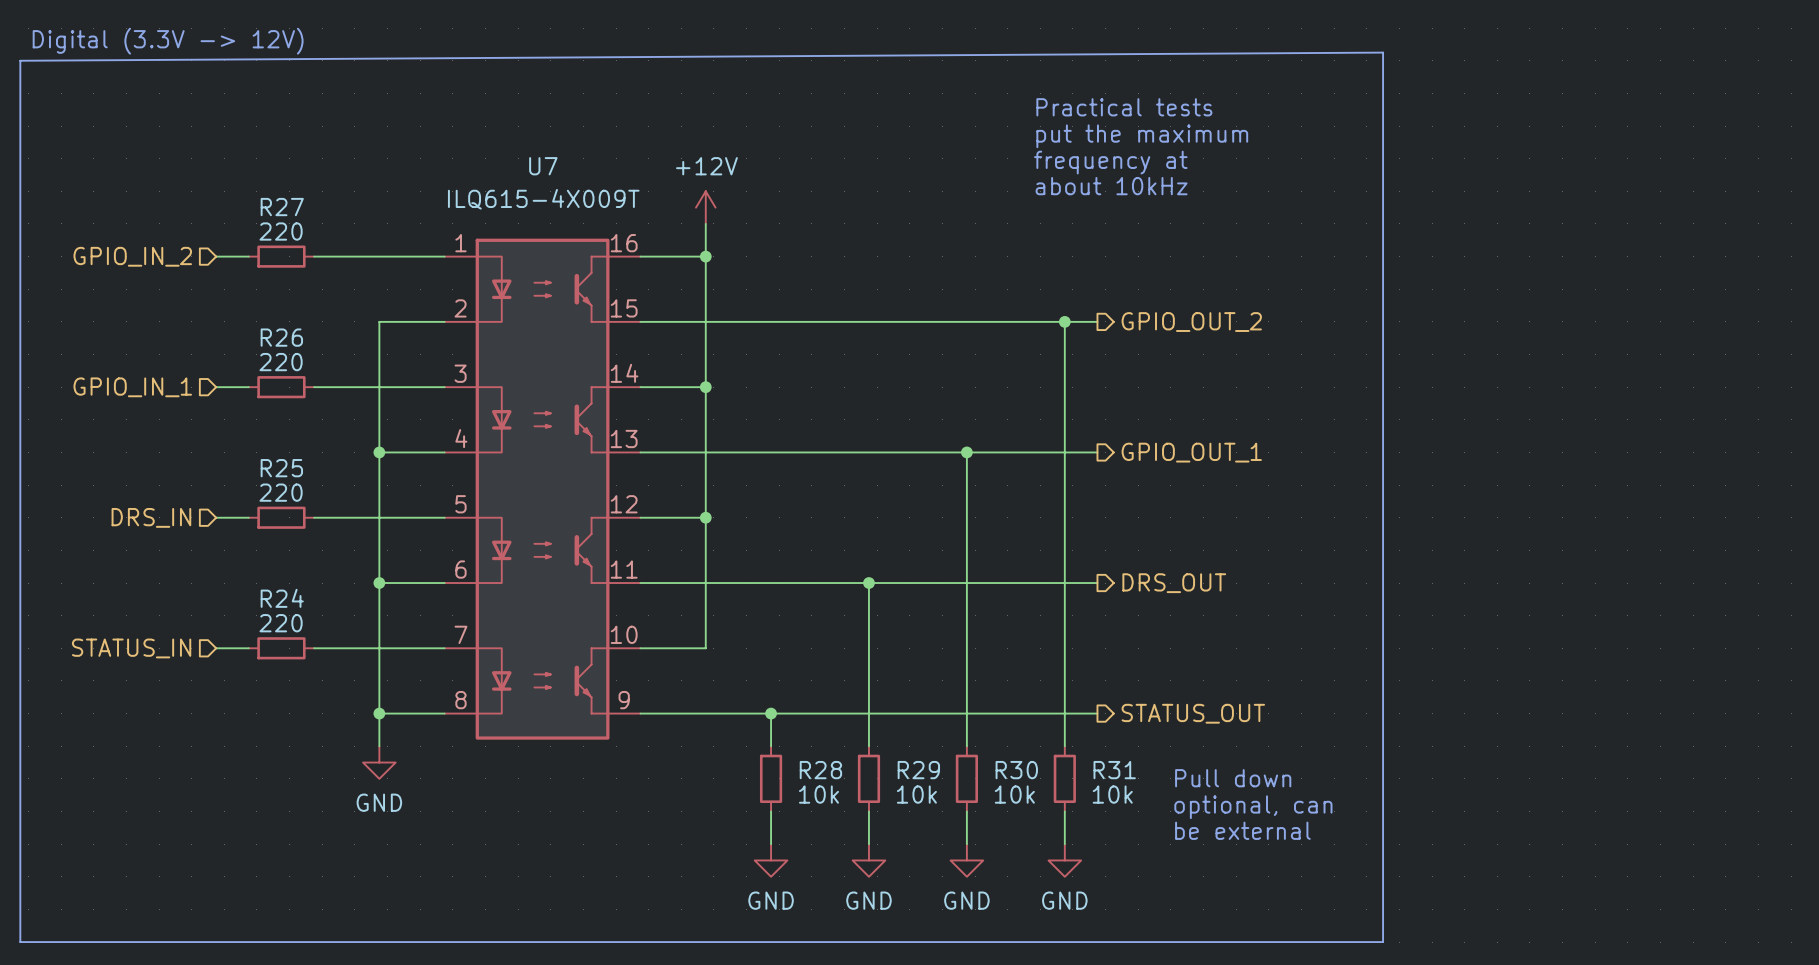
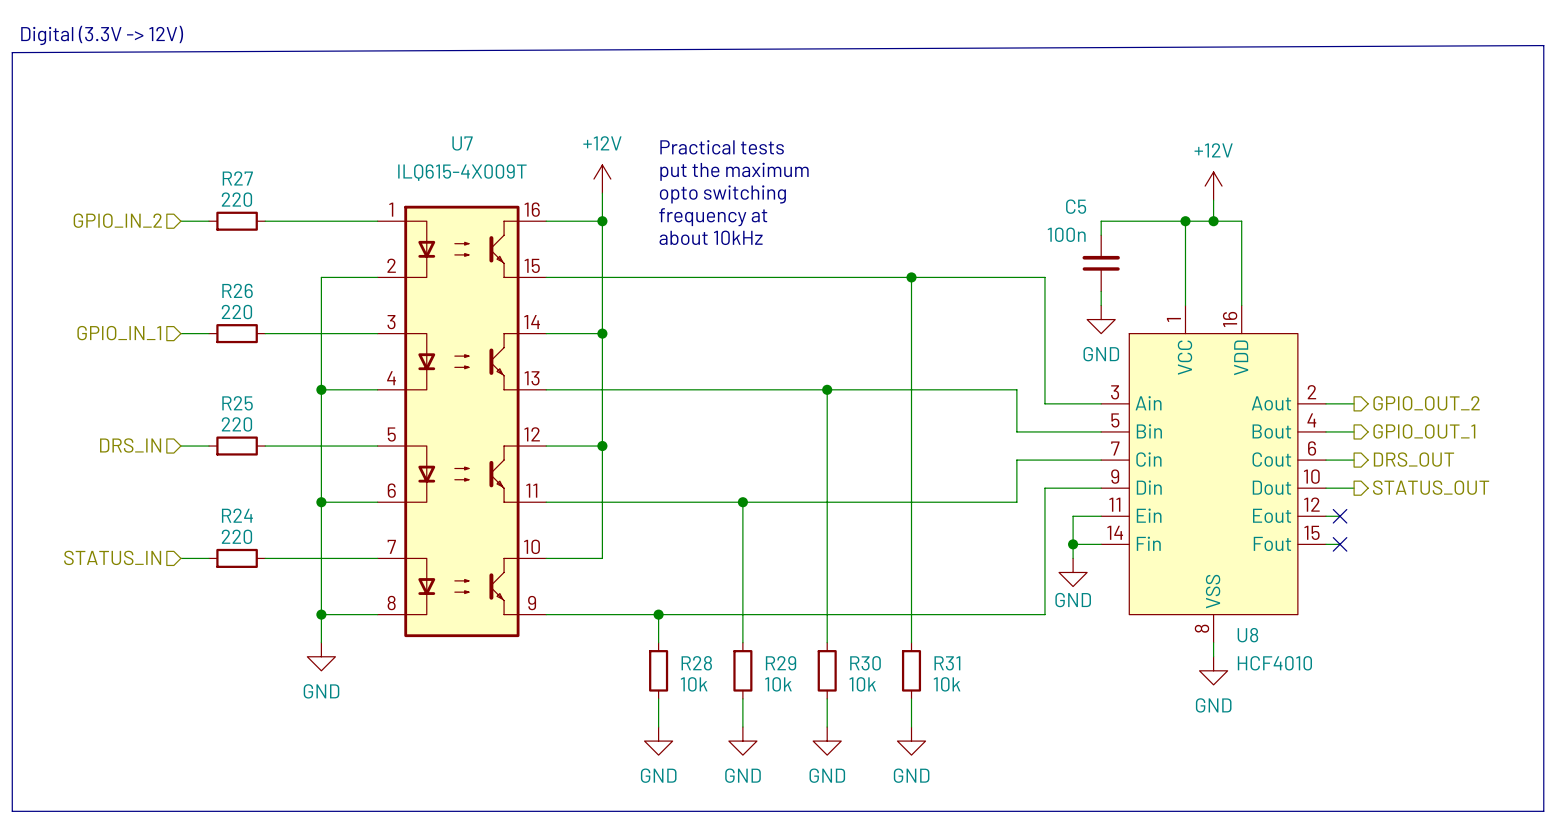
line: (20, 60) (1383, 52) (1383, 942) -> (12, 52) (1543, 45) (1543, 811) (1185, 811)
text position: Practical tests (1124, 107) -> Practical tests (722, 147)
text position: put the maximum (1142, 136) -> put the maximum (734, 171)
text position: frequency at (1110, 162) -> frequency at (713, 217)
text position: about 10kHz (1111, 186) -> about 10kHz (711, 237)
power symbol: none -> +12V (1213, 186)
text: none -> opto switching (722, 194)
wire: none -> (1213, 200) (1213, 221)
junction: none -> (1185, 221)
junction: none -> (1213, 221)
wire: none -> (1101, 235) (1101, 221) (1241, 221) (1241, 305)
C5: none -> 100n (1101, 263)
wire: none -> (939, 277) (1044, 277) (1044, 403) (1101, 403)
hierarchical label: GPIO_OUT_2 (1191, 322) -> none
wire: none -> (1101, 291) (1101, 305)
power symbol: none -> GND (1101, 319)
wire: none -> (939, 389) (1016, 389) (1016, 431) (1101, 431)
hierarchical label: GPIO_OUT_1 (1191, 452) -> none
wire: none -> (1325, 403) (1354, 403)
hierarchical label: none -> GPIO_OUT_2 (1426, 403)
wire: none -> (1325, 431) (1354, 431)
hierarchical label: none -> GPIO_OUT_1 (1424, 431)
wire: none -> (1101, 460) (1016, 460) (1016, 502) (939, 502)
wire: none -> (1325, 460) (1354, 460)
hierarchical label: none -> DRS_OUT (1413, 459)
U8: none -> HCF4010 (1213, 474)
wire: none -> (1101, 488) (1044, 488) (1044, 614) (939, 614)
wire: none -> (1325, 488) (1354, 488)
hierarchical label: none -> STATUS_OUT (1431, 487)
hierarchical label: DRS_OUT (1174, 583) -> none
wire: none -> (1101, 516) (1073, 516) (1073, 558)
wire: none -> (1325, 516) (1340, 516)
no-connect mark: none -> (1340, 516)
wire: none -> (1073, 544) (1101, 544)
junction: none -> (1073, 544)
wire: none -> (1325, 544) (1340, 544)
no-connect mark: none -> (1340, 544)
power symbol: none -> GND (1073, 572)
hierarchical label: STATUS_OUT (1193, 713) -> none
wire: none -> (1213, 642) (1213, 656)
text: Pull down (1233, 778) -> none
power symbol: none -> GND (1213, 670)
text: optional, can (1253, 807) -> none
text: be external (1242, 830) -> none

